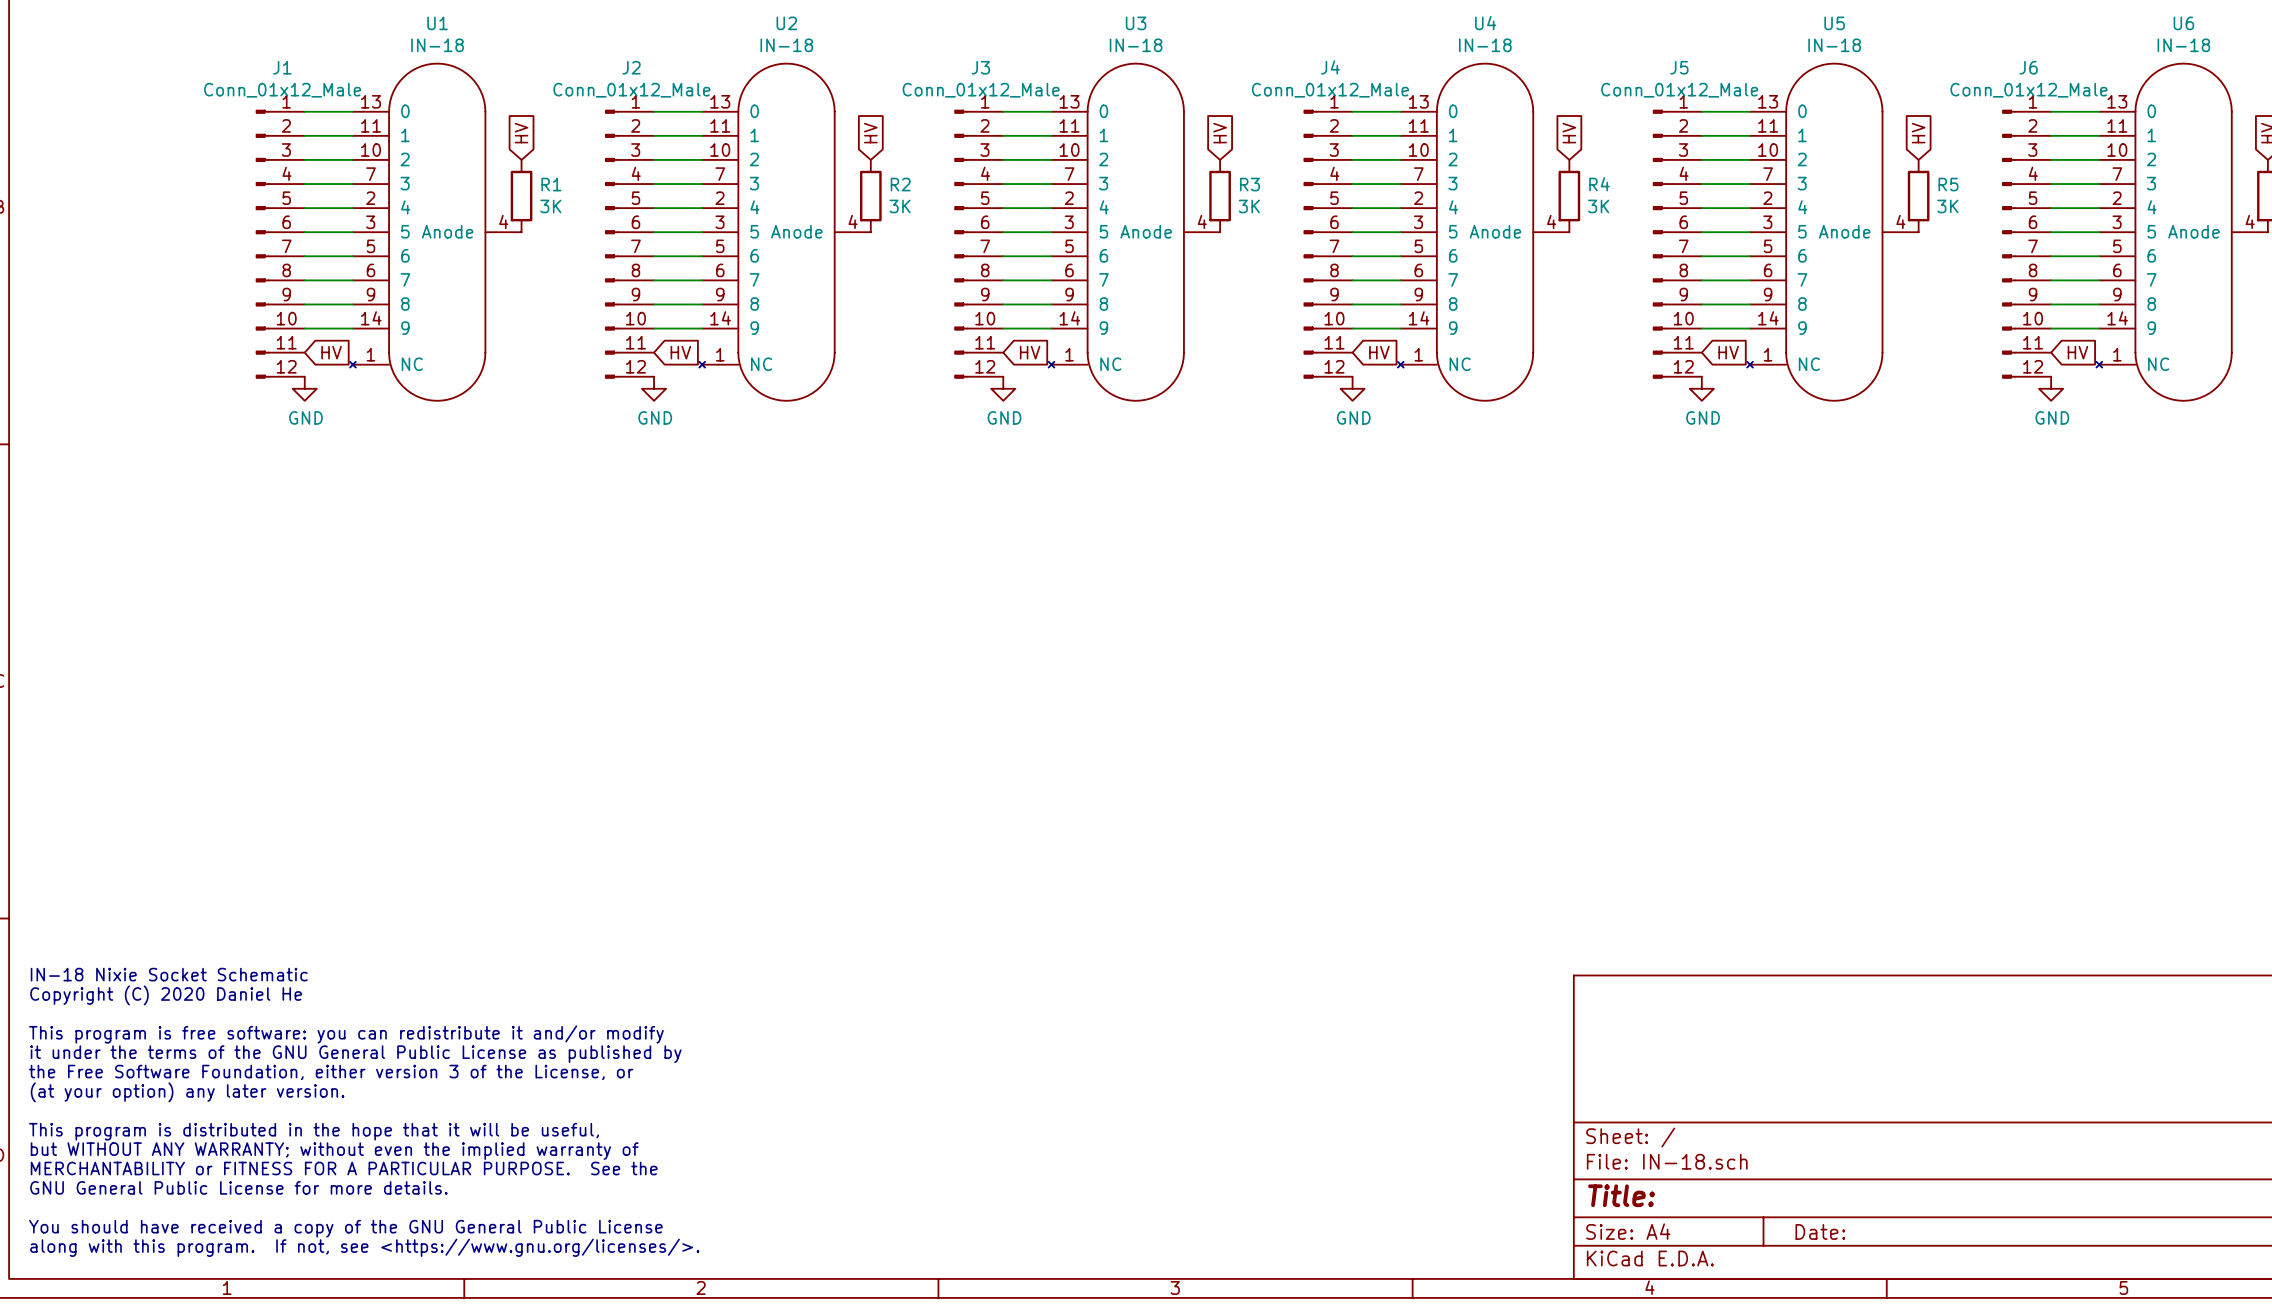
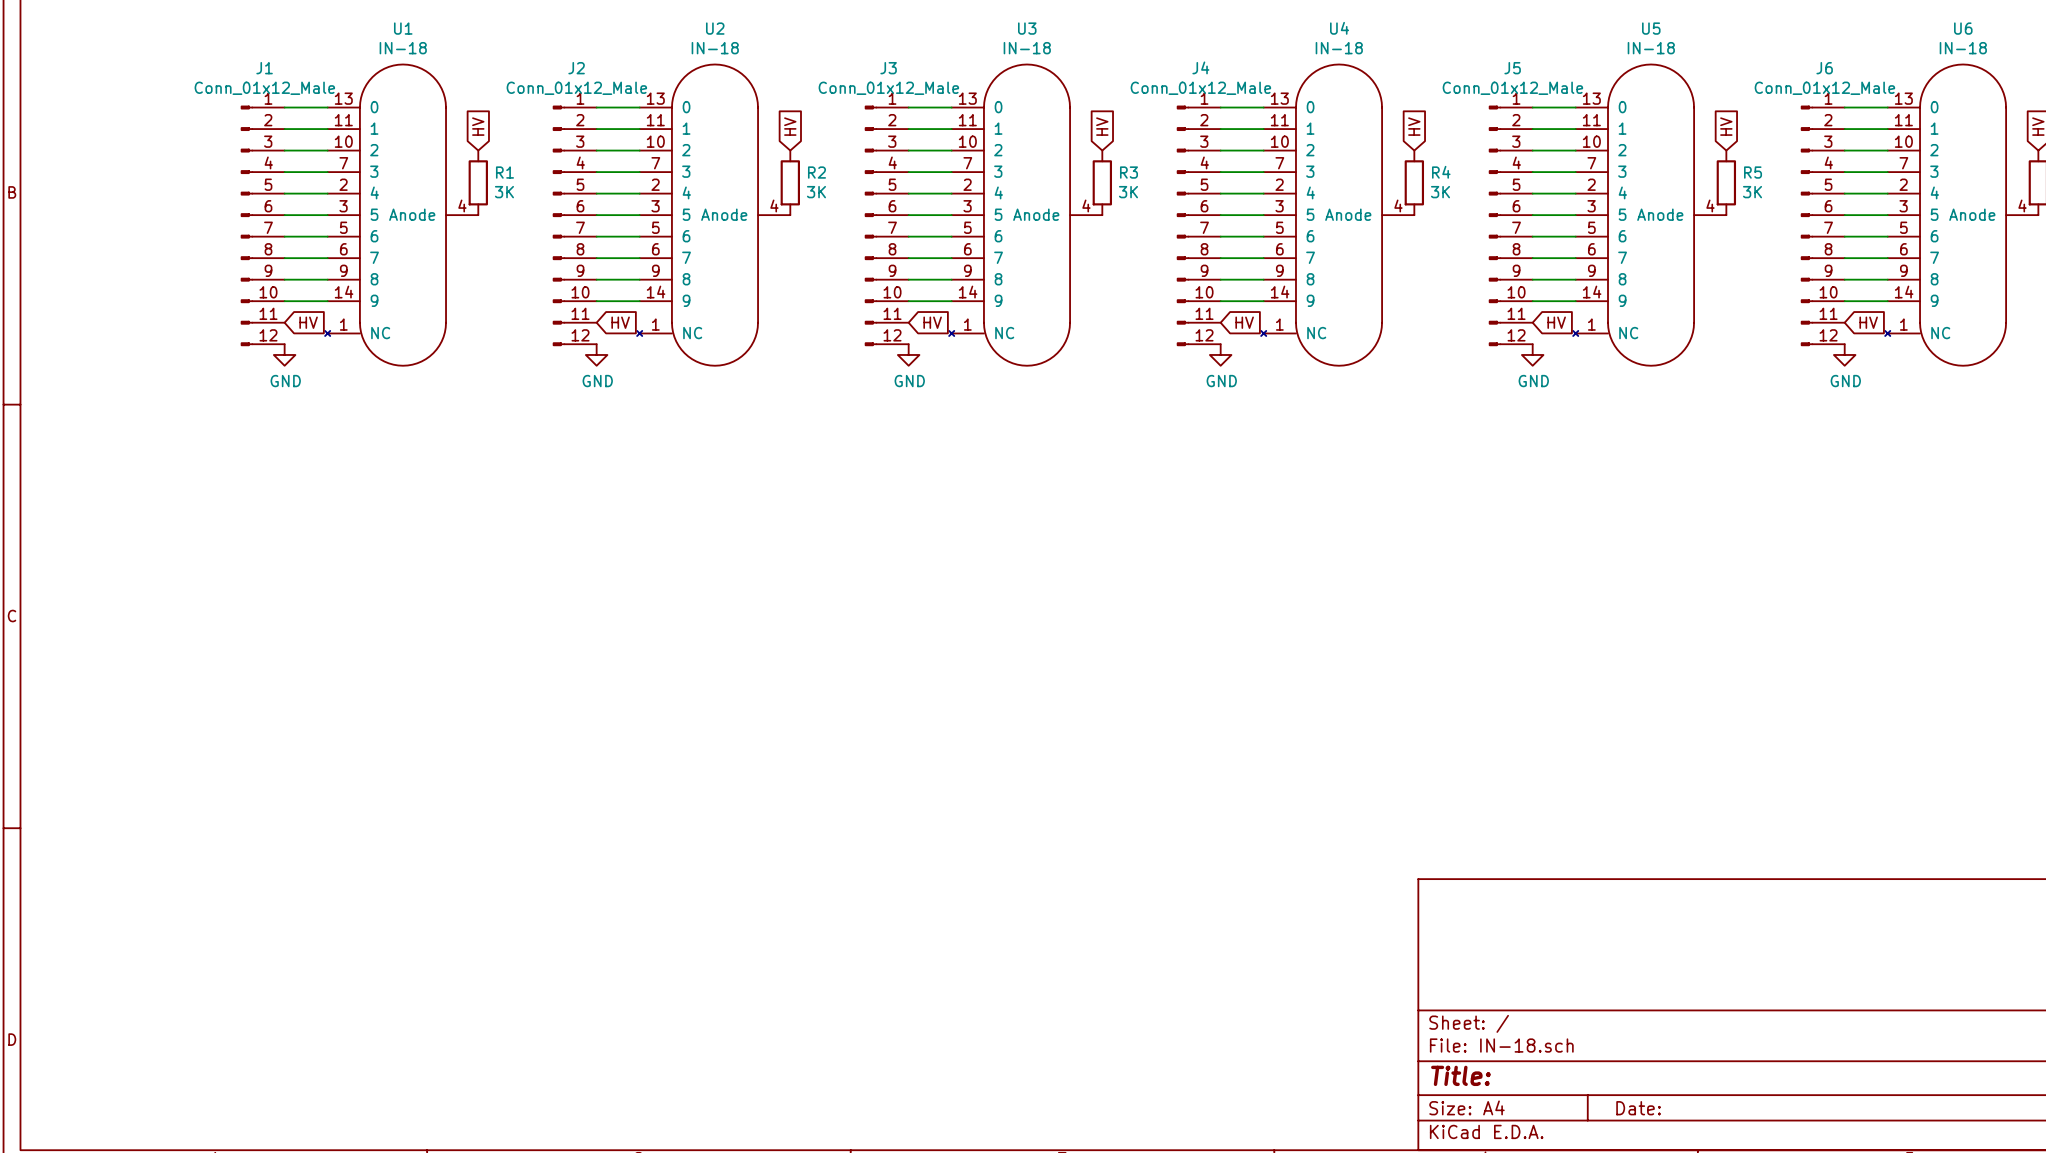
text: IN-18 Nixie Socket Schematic (169, 974) -> none
text: Copyright (C) 2020 Daniel He (166, 995) -> none
text: This program is free software: you can redistribute it and/or modify (346, 1034) -> none
text: it under the terms of the GNU General Public License as published by (355, 1054) -> none
text: the Free Software Foundation, either version 3 of the License, or (331, 1072) -> none
text: (at your option) any later version. (187, 1092) -> none
text: This program is distributed in the hope that it will be useful, (314, 1131) -> none
text: but WITHOUT ANY WARRANTY; without even the implied warranty of (334, 1151) -> none
text: MERCHANTABILITY or FITNESS FOR A PARTICULAR PURPOSE. See the (344, 1168) -> none
text: GNU General Public License for more details. (238, 1187) -> none
text: You should have received a copy of the GNU General Public License (345, 1228) -> none
text: along with this program. If not, see <https://www.gnu.org/licenses/>. (364, 1247) -> none

